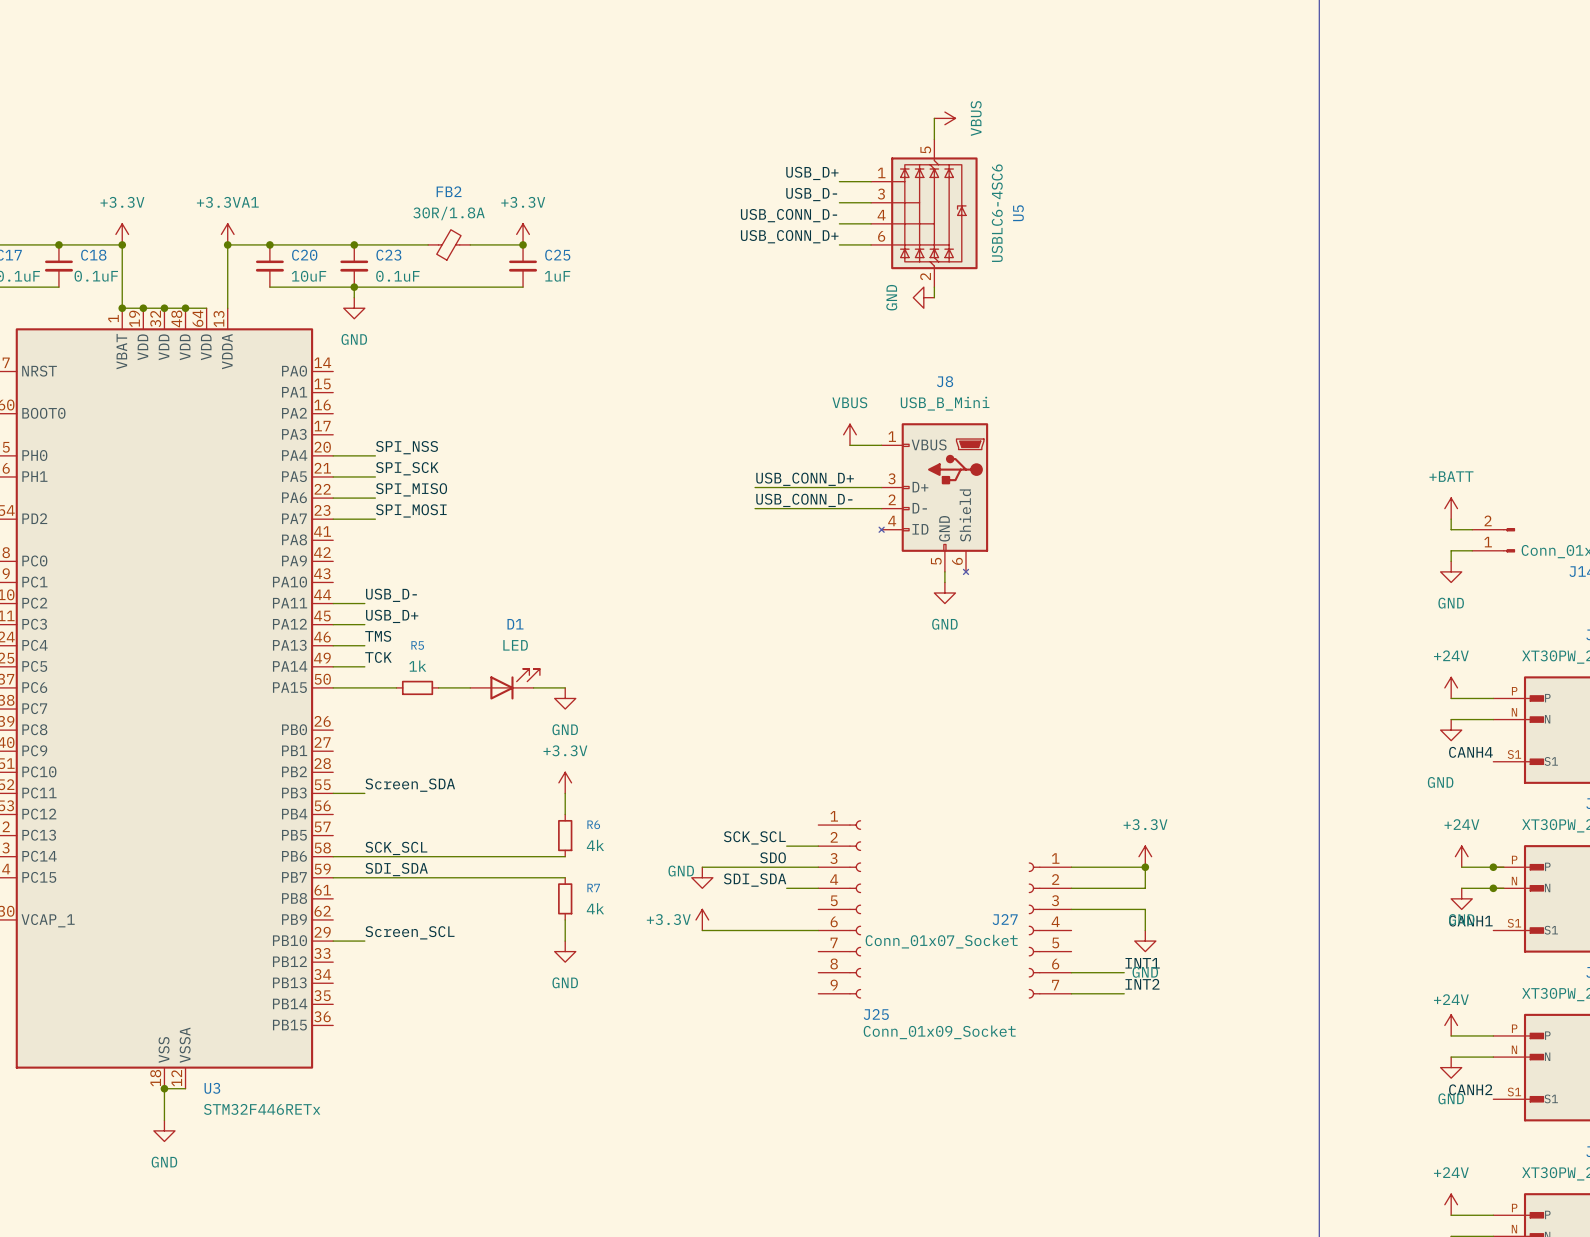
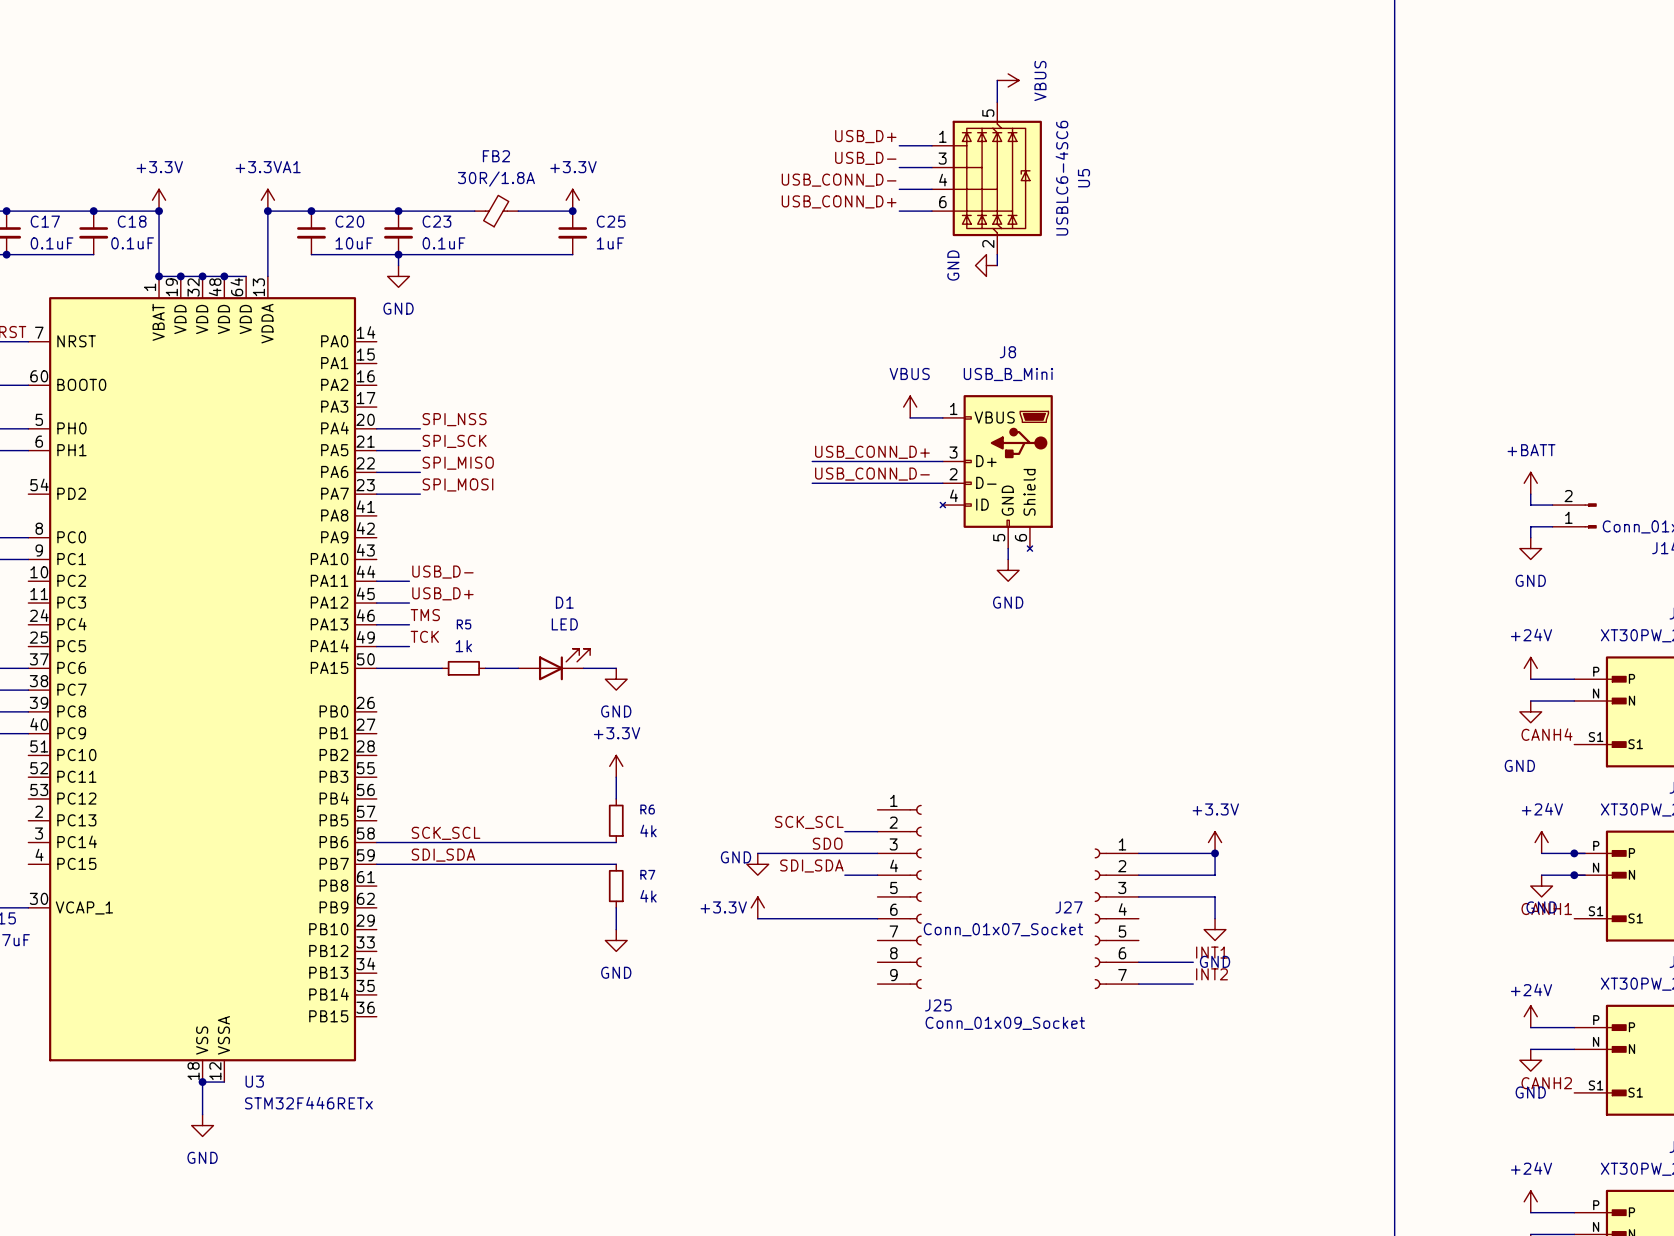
label: Screen_SDA (410, 785) -> none
wire: (333, 793) (364, 793) -> none
label: Screen_SCL (410, 932) -> none
wire: (333, 941) (364, 941) -> none

